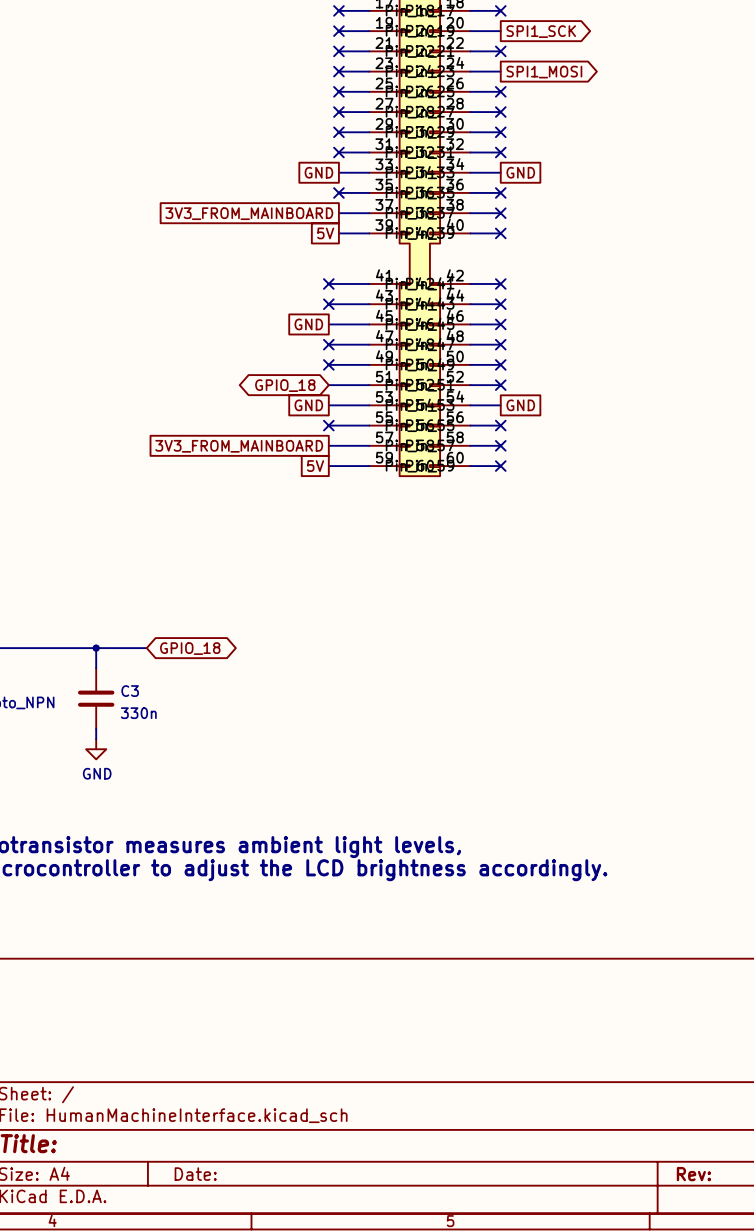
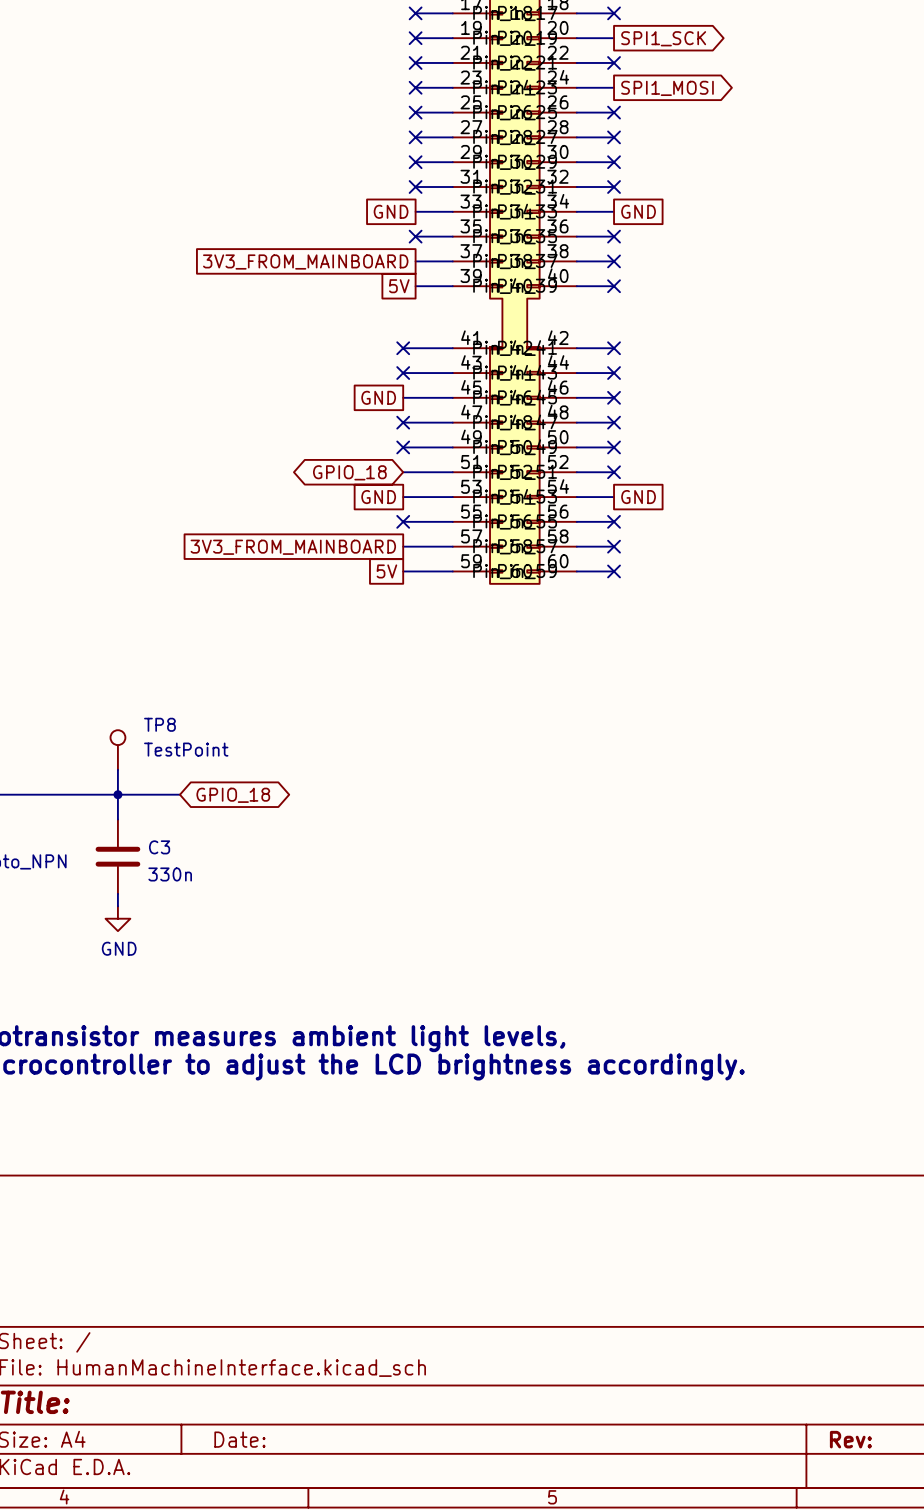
TP8: none -> TestPoint (117, 750)
wire: none -> (117, 769) (117, 794)

